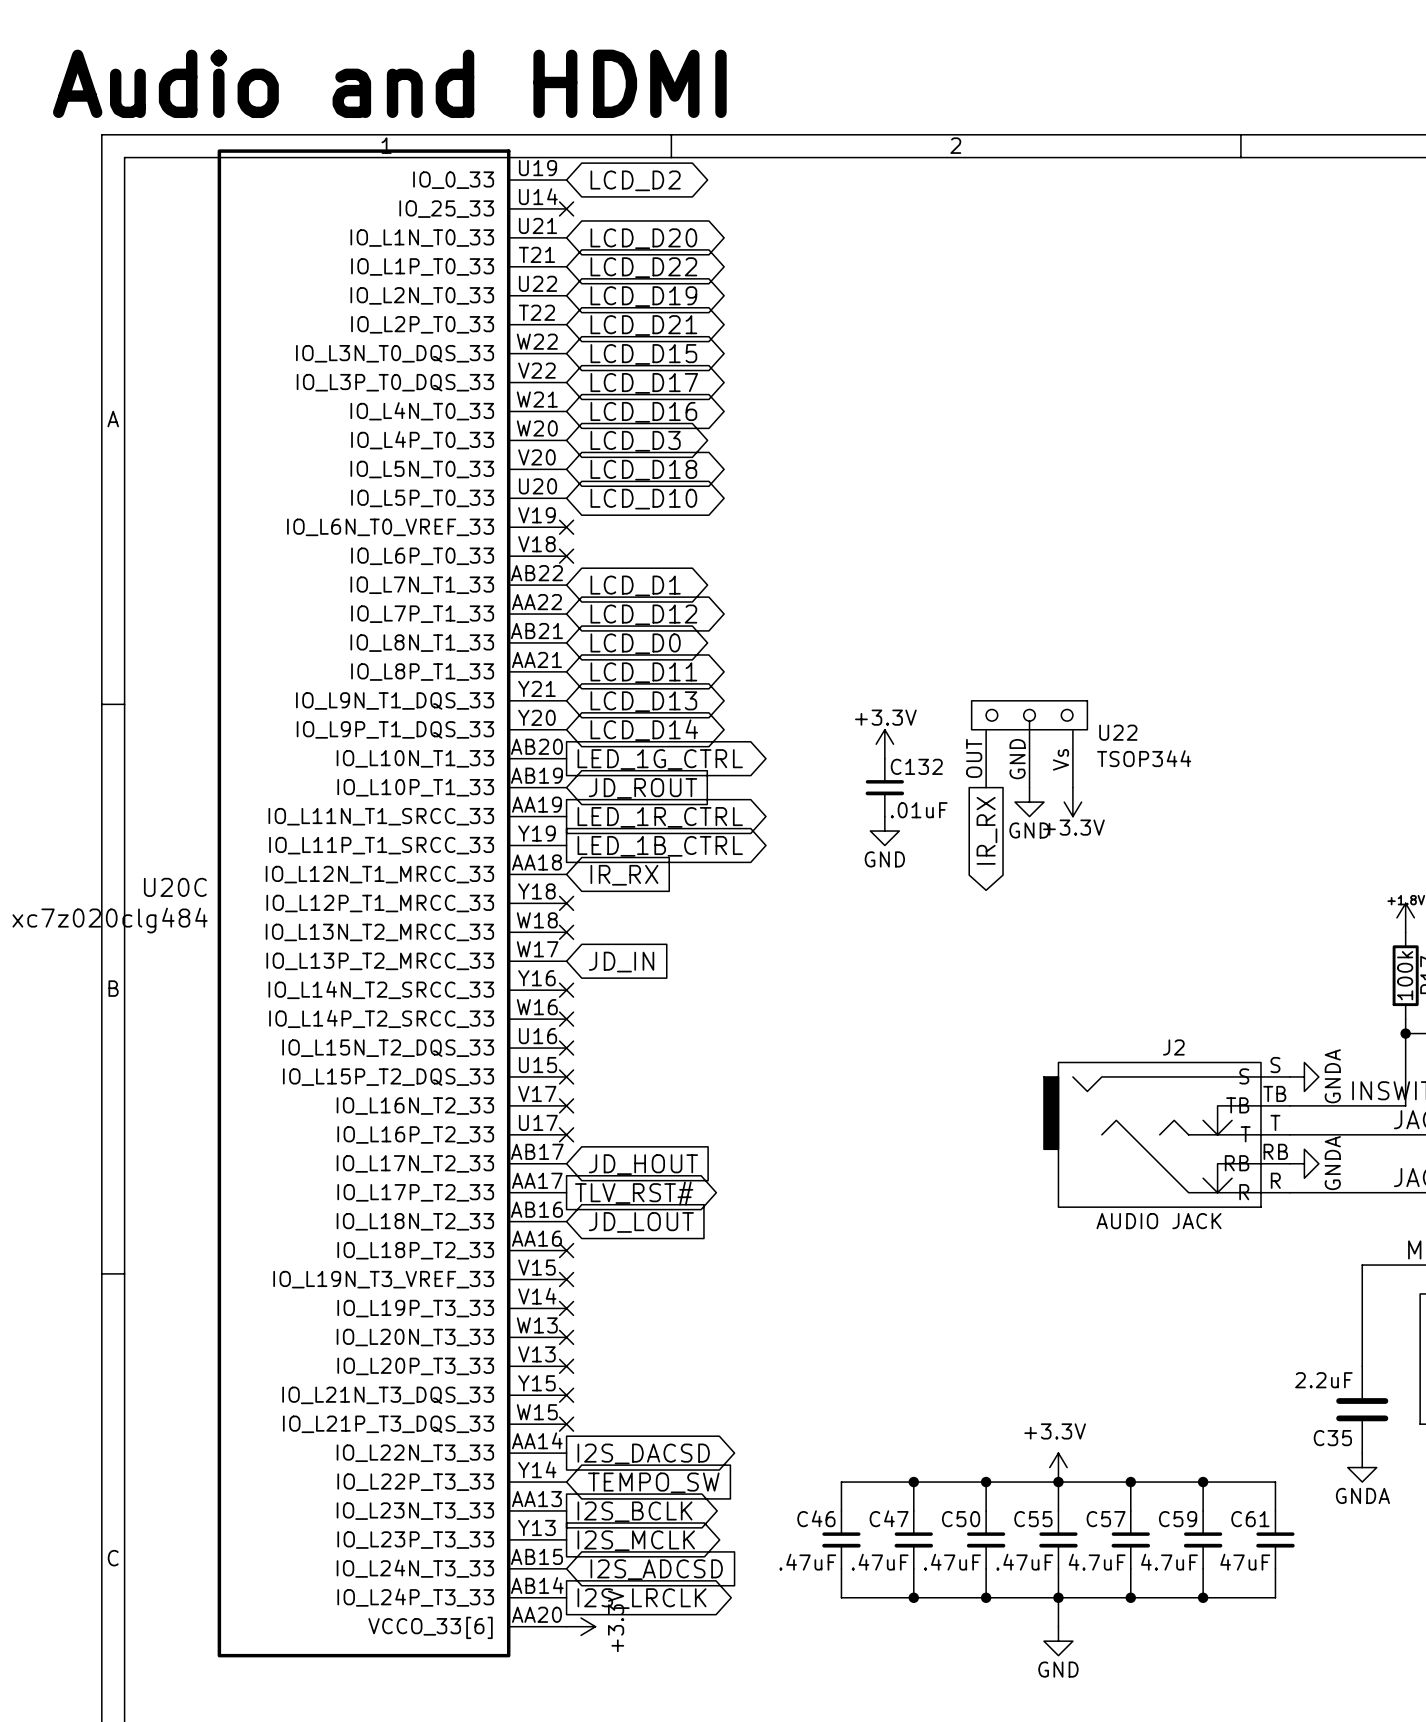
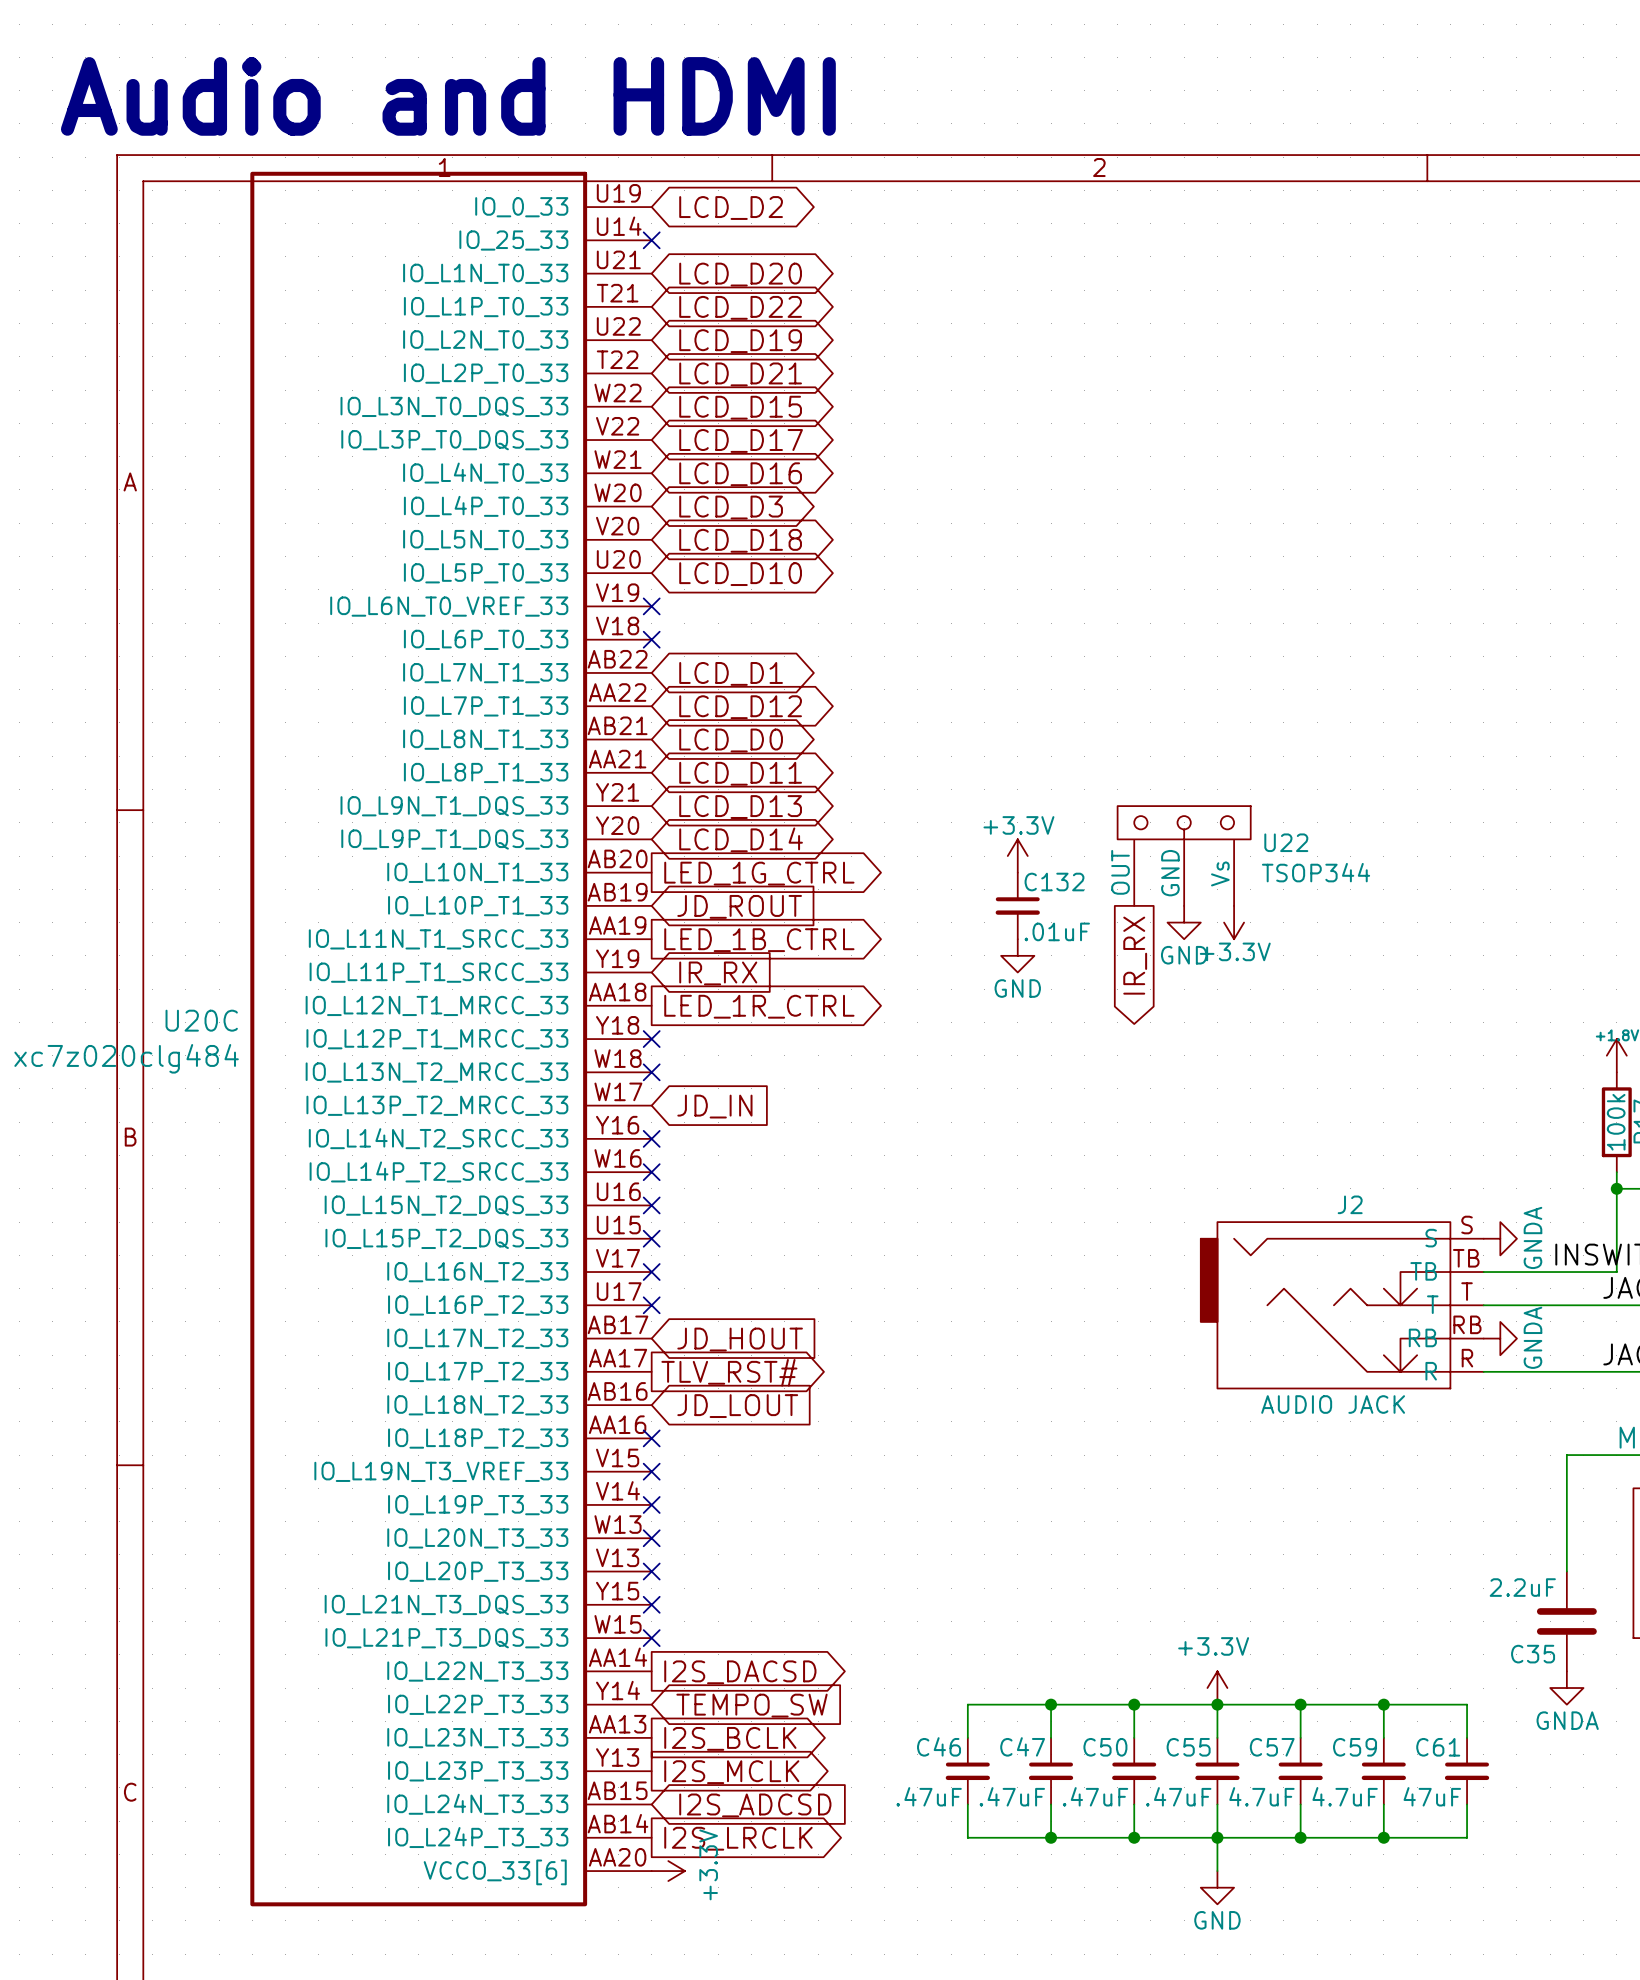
global label: LED_1R_CTRL (660, 817) -> LED_1B_CTRL (759, 940)
global label shape: output (660, 846) -> input (718, 973)
global label: LED_1B_CTRL (660, 846) -> IR_RX (718, 973)
global label shape: input (624, 875) -> output (759, 1006)
global label: IR_RX (624, 875) -> LED_1R_CTRL (759, 1006)

